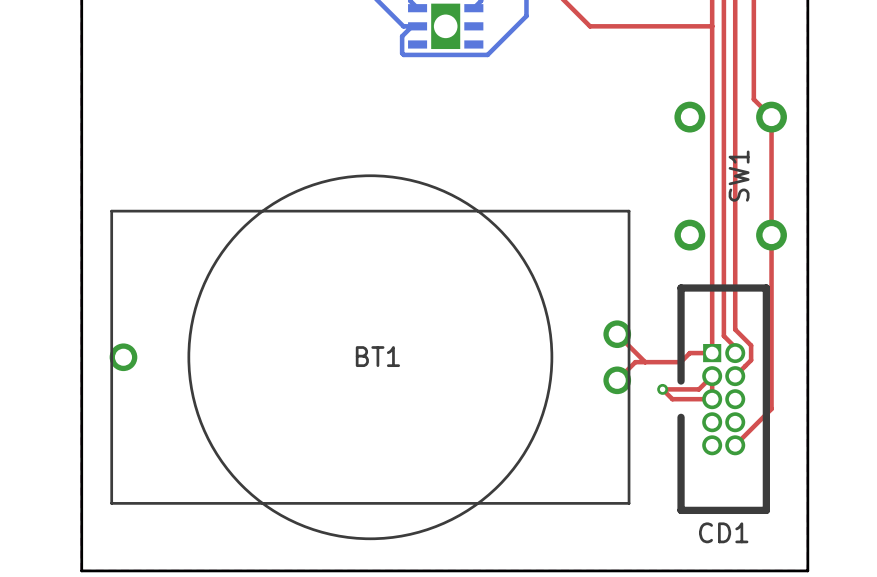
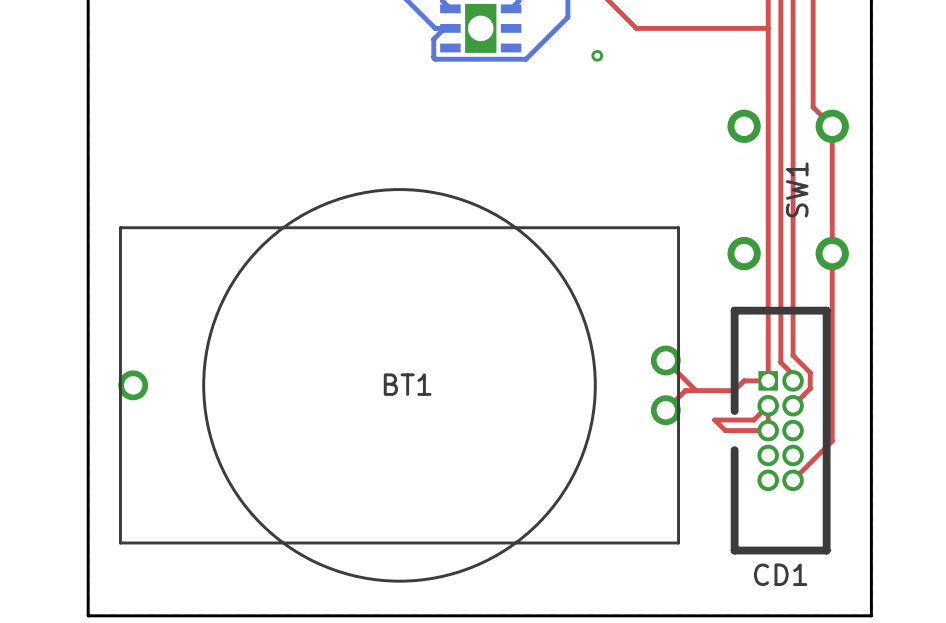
part position: (662, 389) -> (597, 55)

